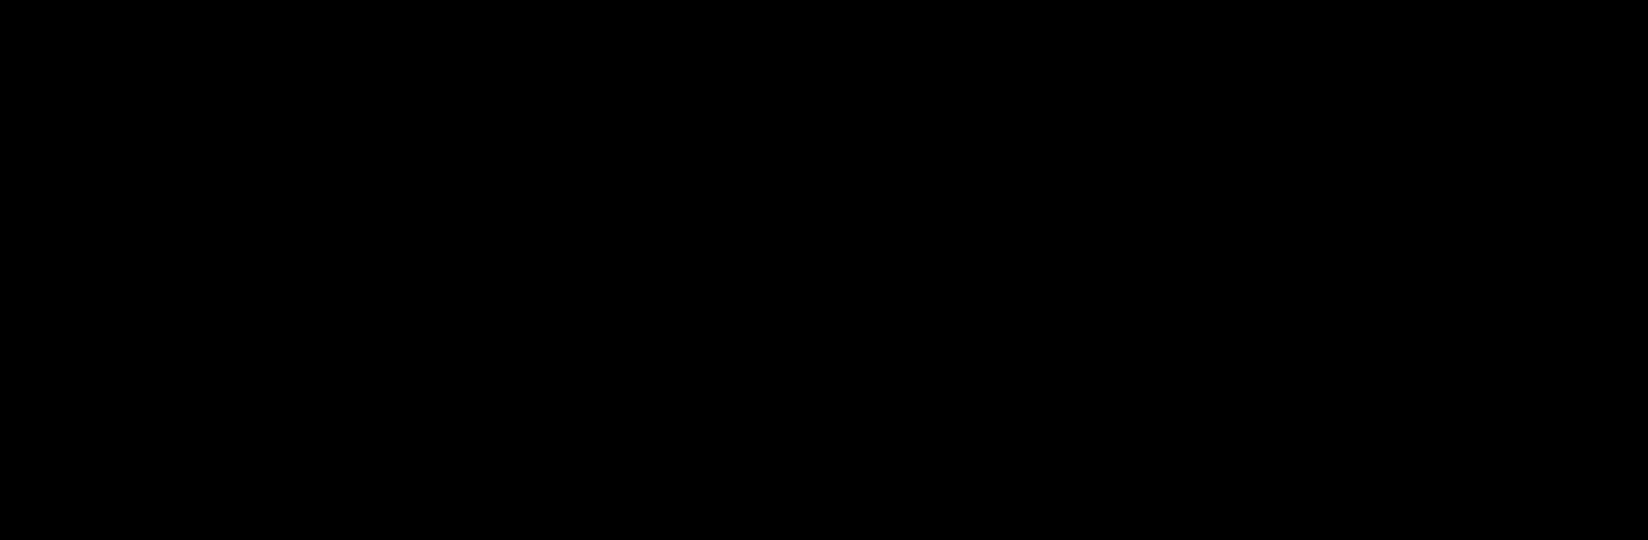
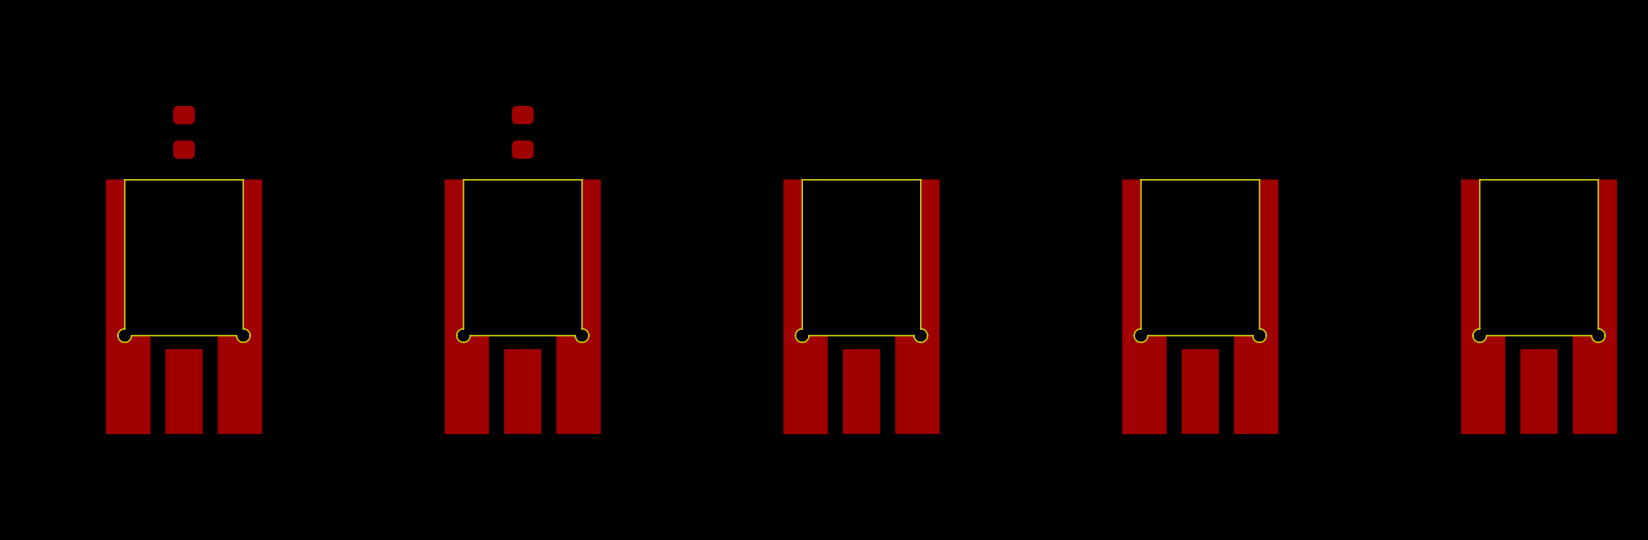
part: none -> (184, 132)
part: none -> (522, 132)
part: none -> (184, 306)
part: none -> (522, 306)
part: none -> (861, 306)
part: none -> (1200, 306)
part: none -> (1539, 306)

